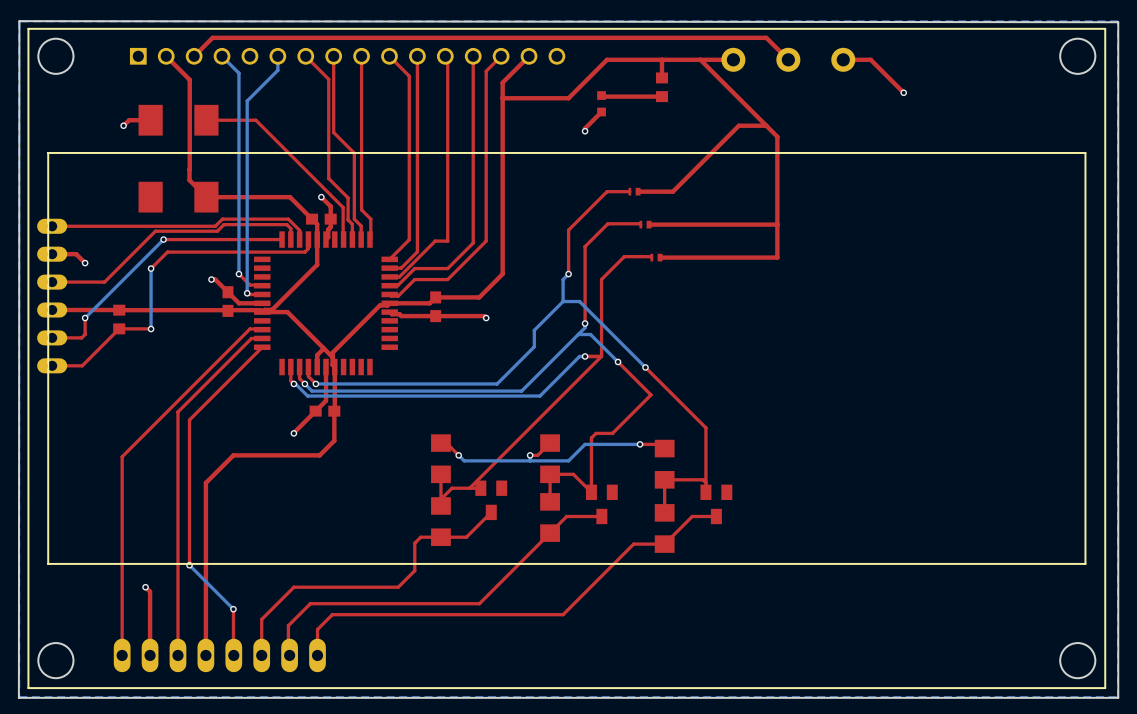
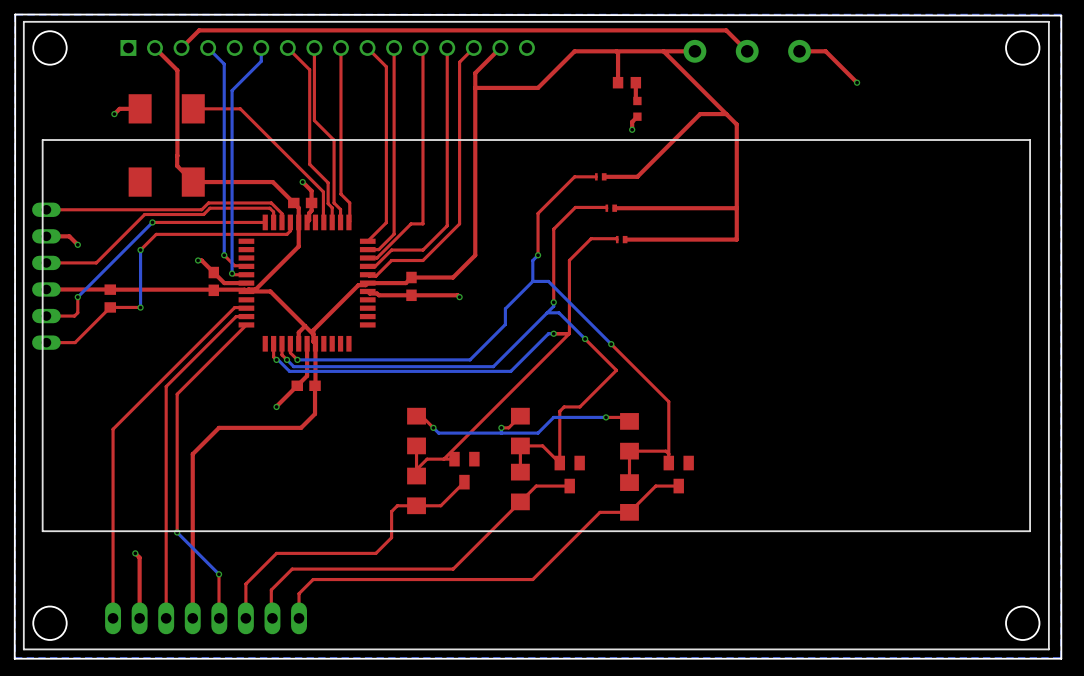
top track: none -> (616, 51) (618, 82)
top track: (661, 59) (661, 77) -> none
part rotation: 0° (661, 87) -> 90° clockwise (626, 82)
top track: none -> (635, 82) (637, 101)
top track: (601, 95) (661, 96) -> none
part position: (601, 103) -> (637, 108)
top track: (601, 112) (585, 128) (585, 131) -> none
top track: none -> (637, 116) (632, 121) (632, 129)
via: (585, 131) -> none
via: none -> (632, 129)

